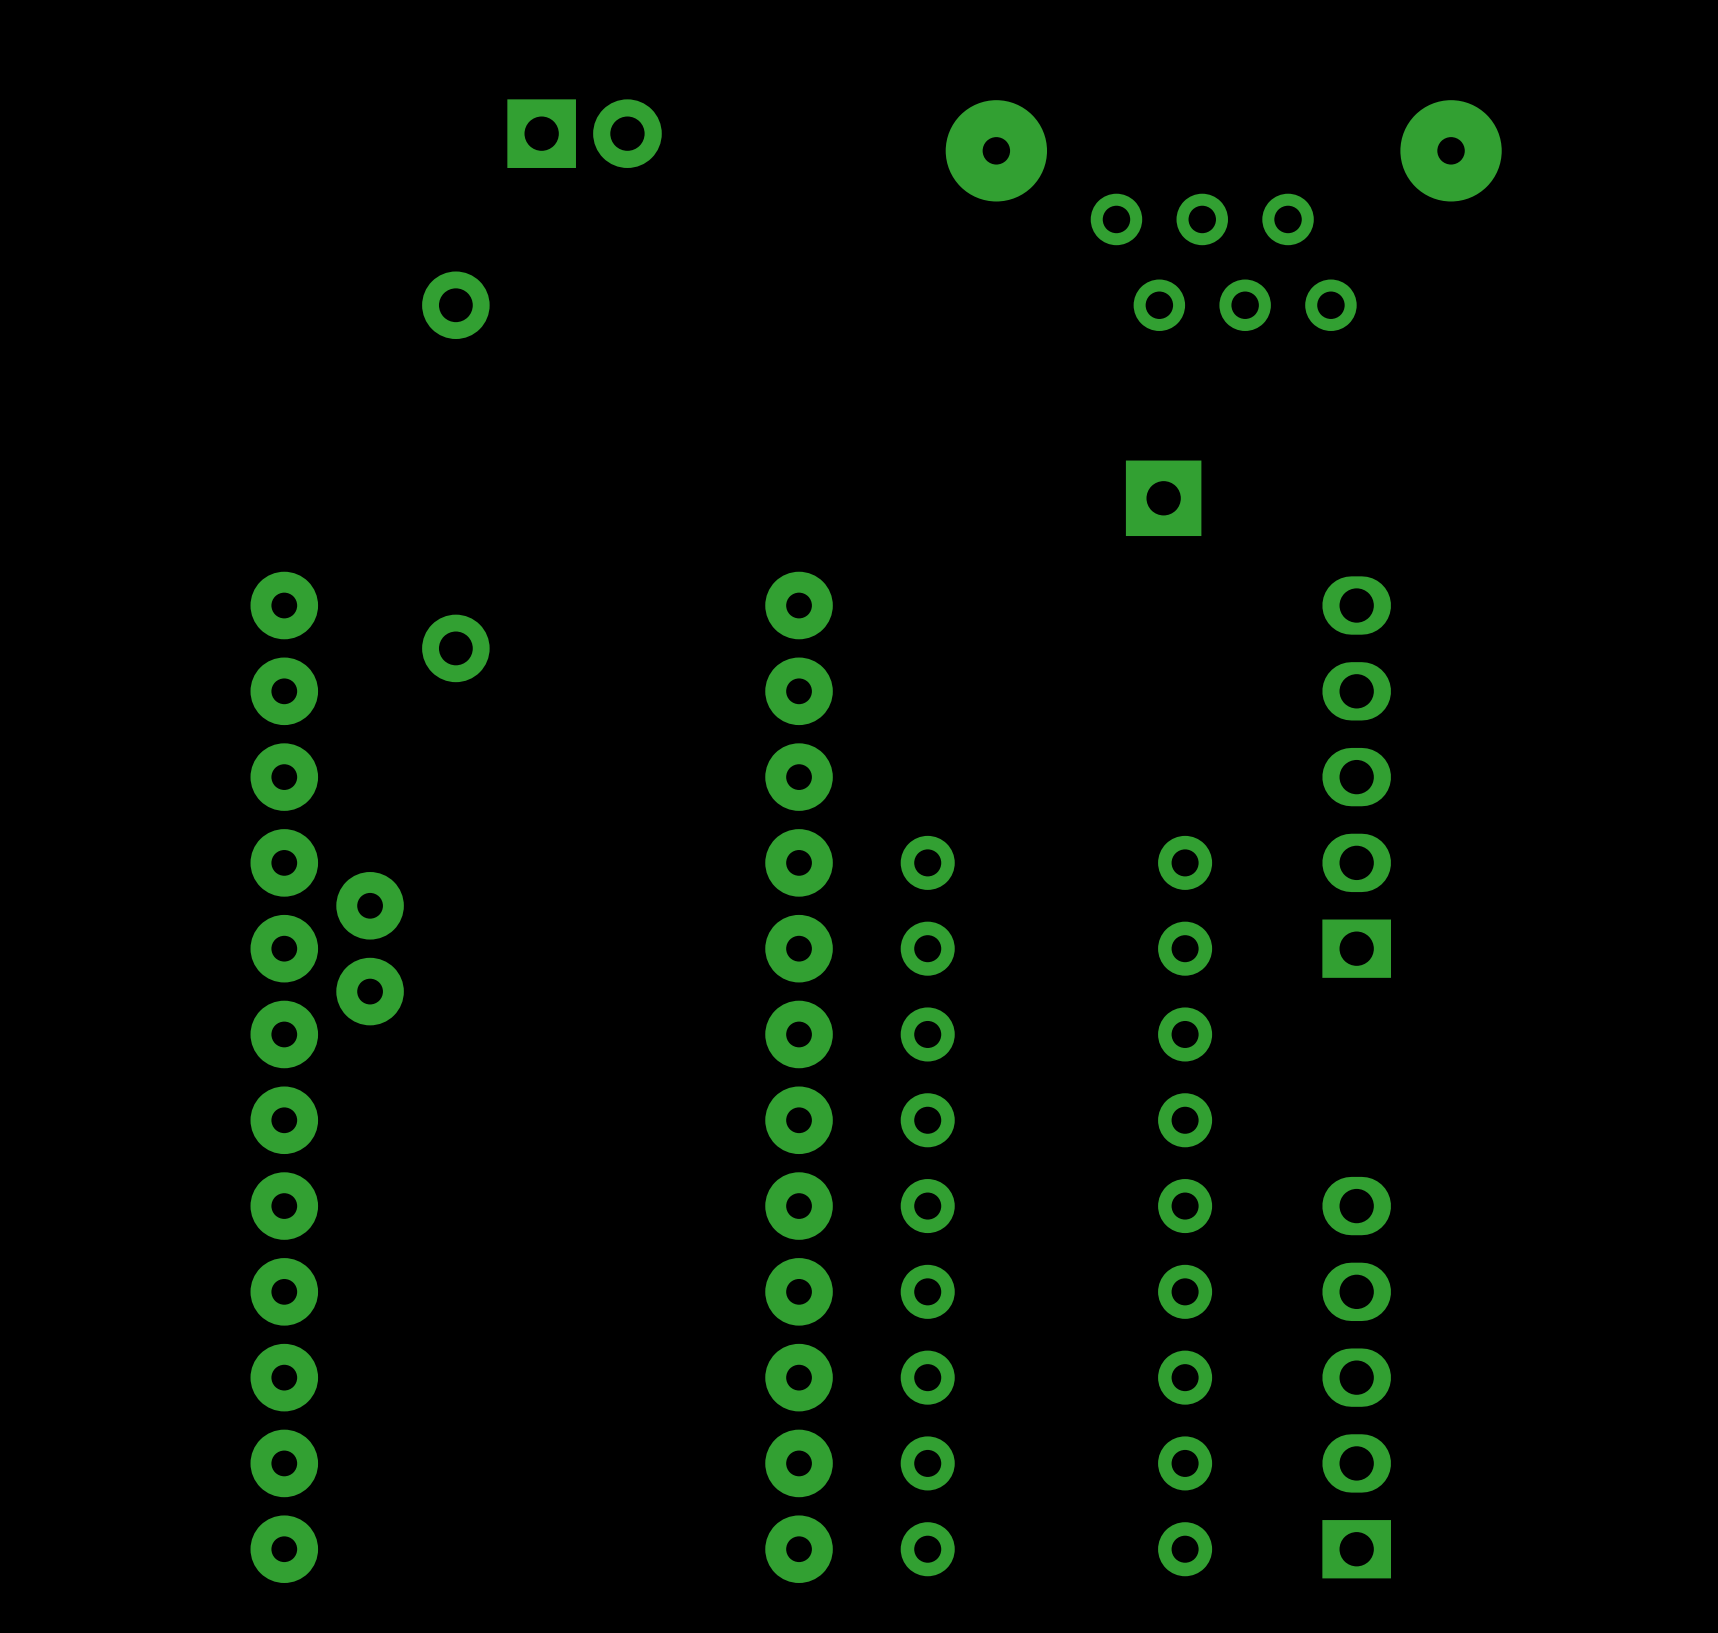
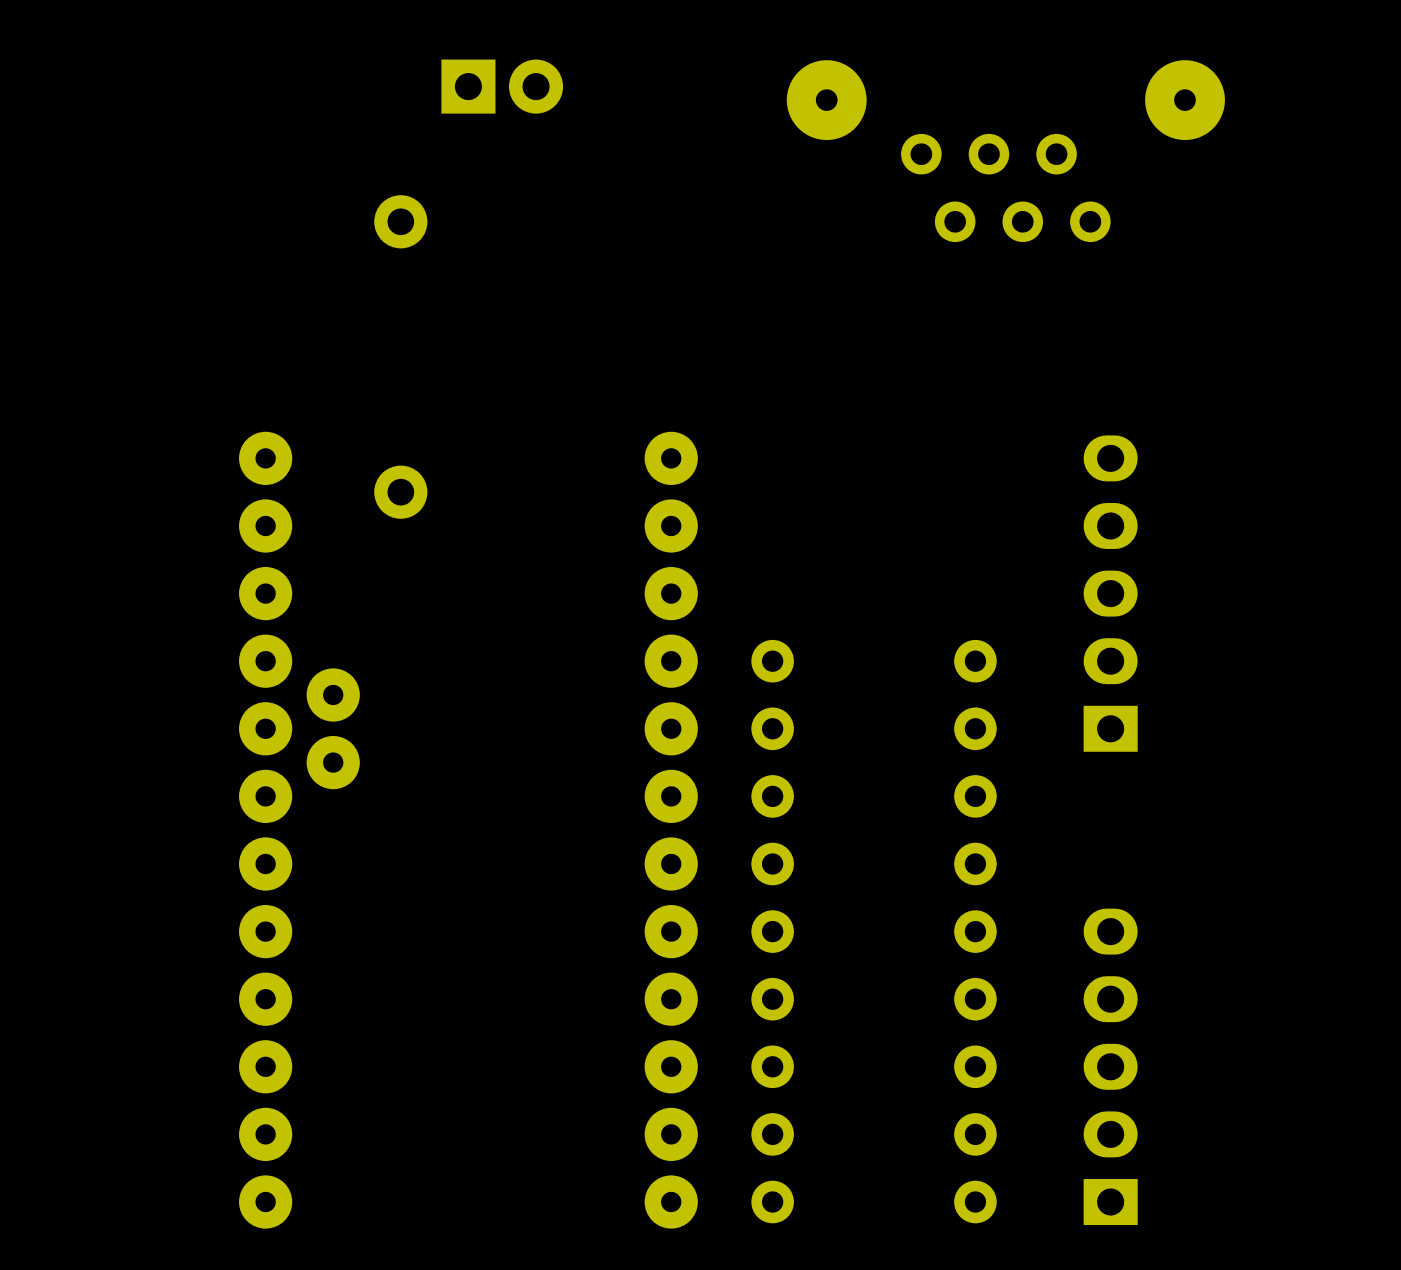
part: (1163, 498) -> none

